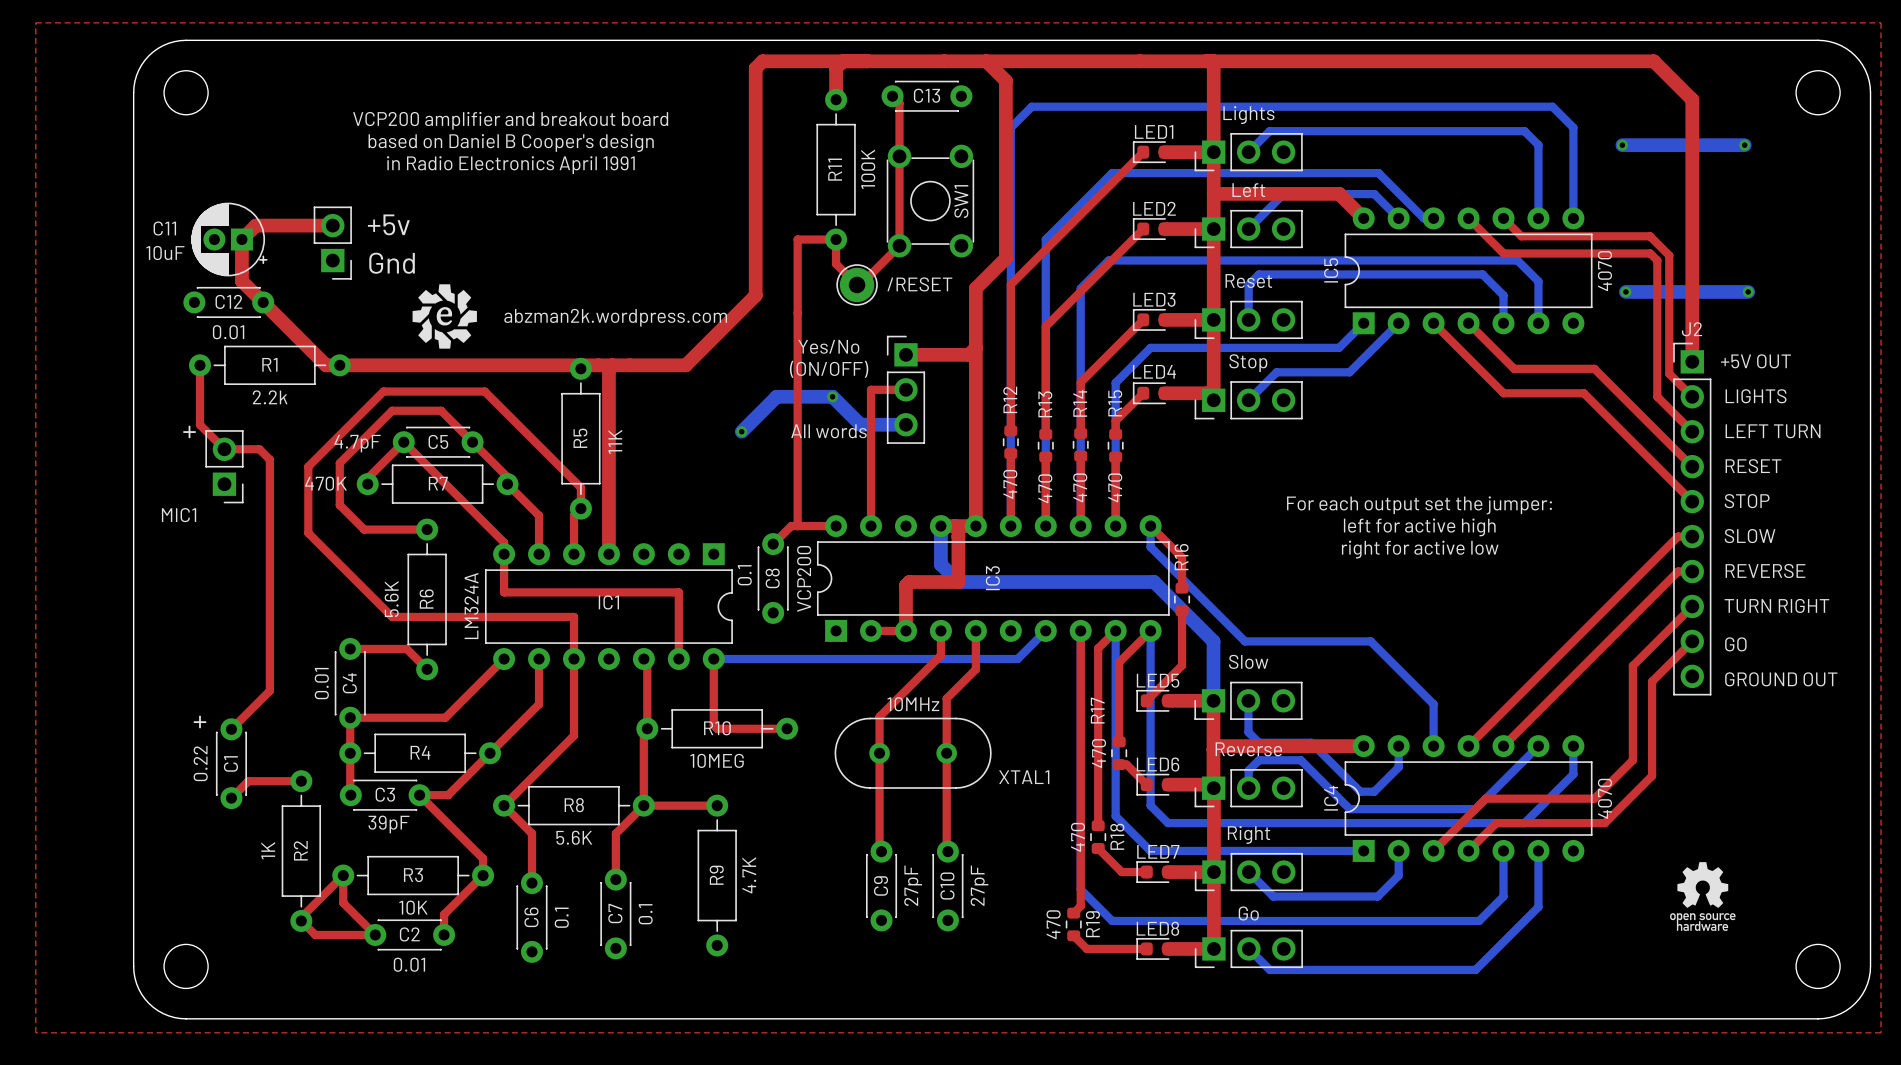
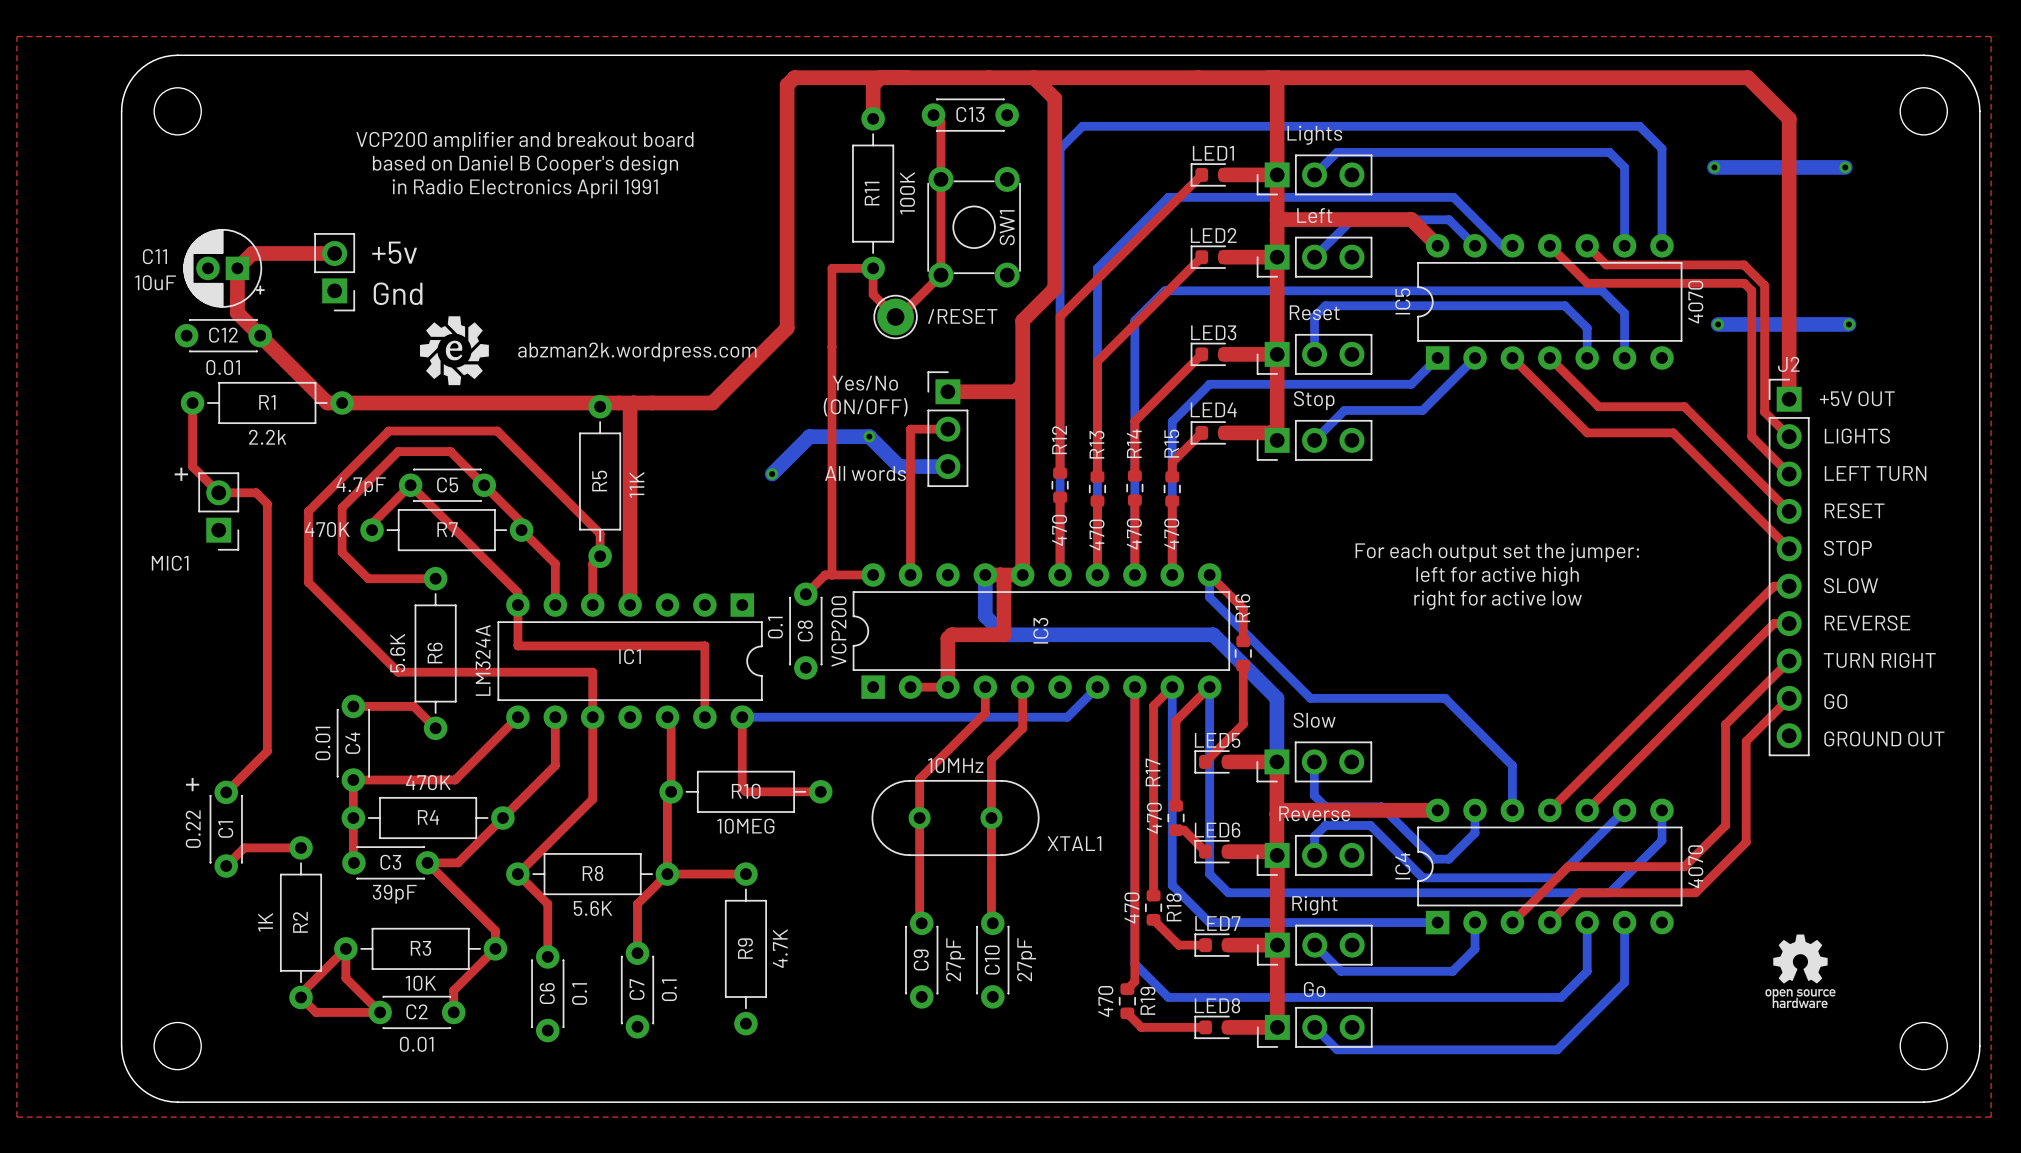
R4 value: none -> 470K (428, 782)

